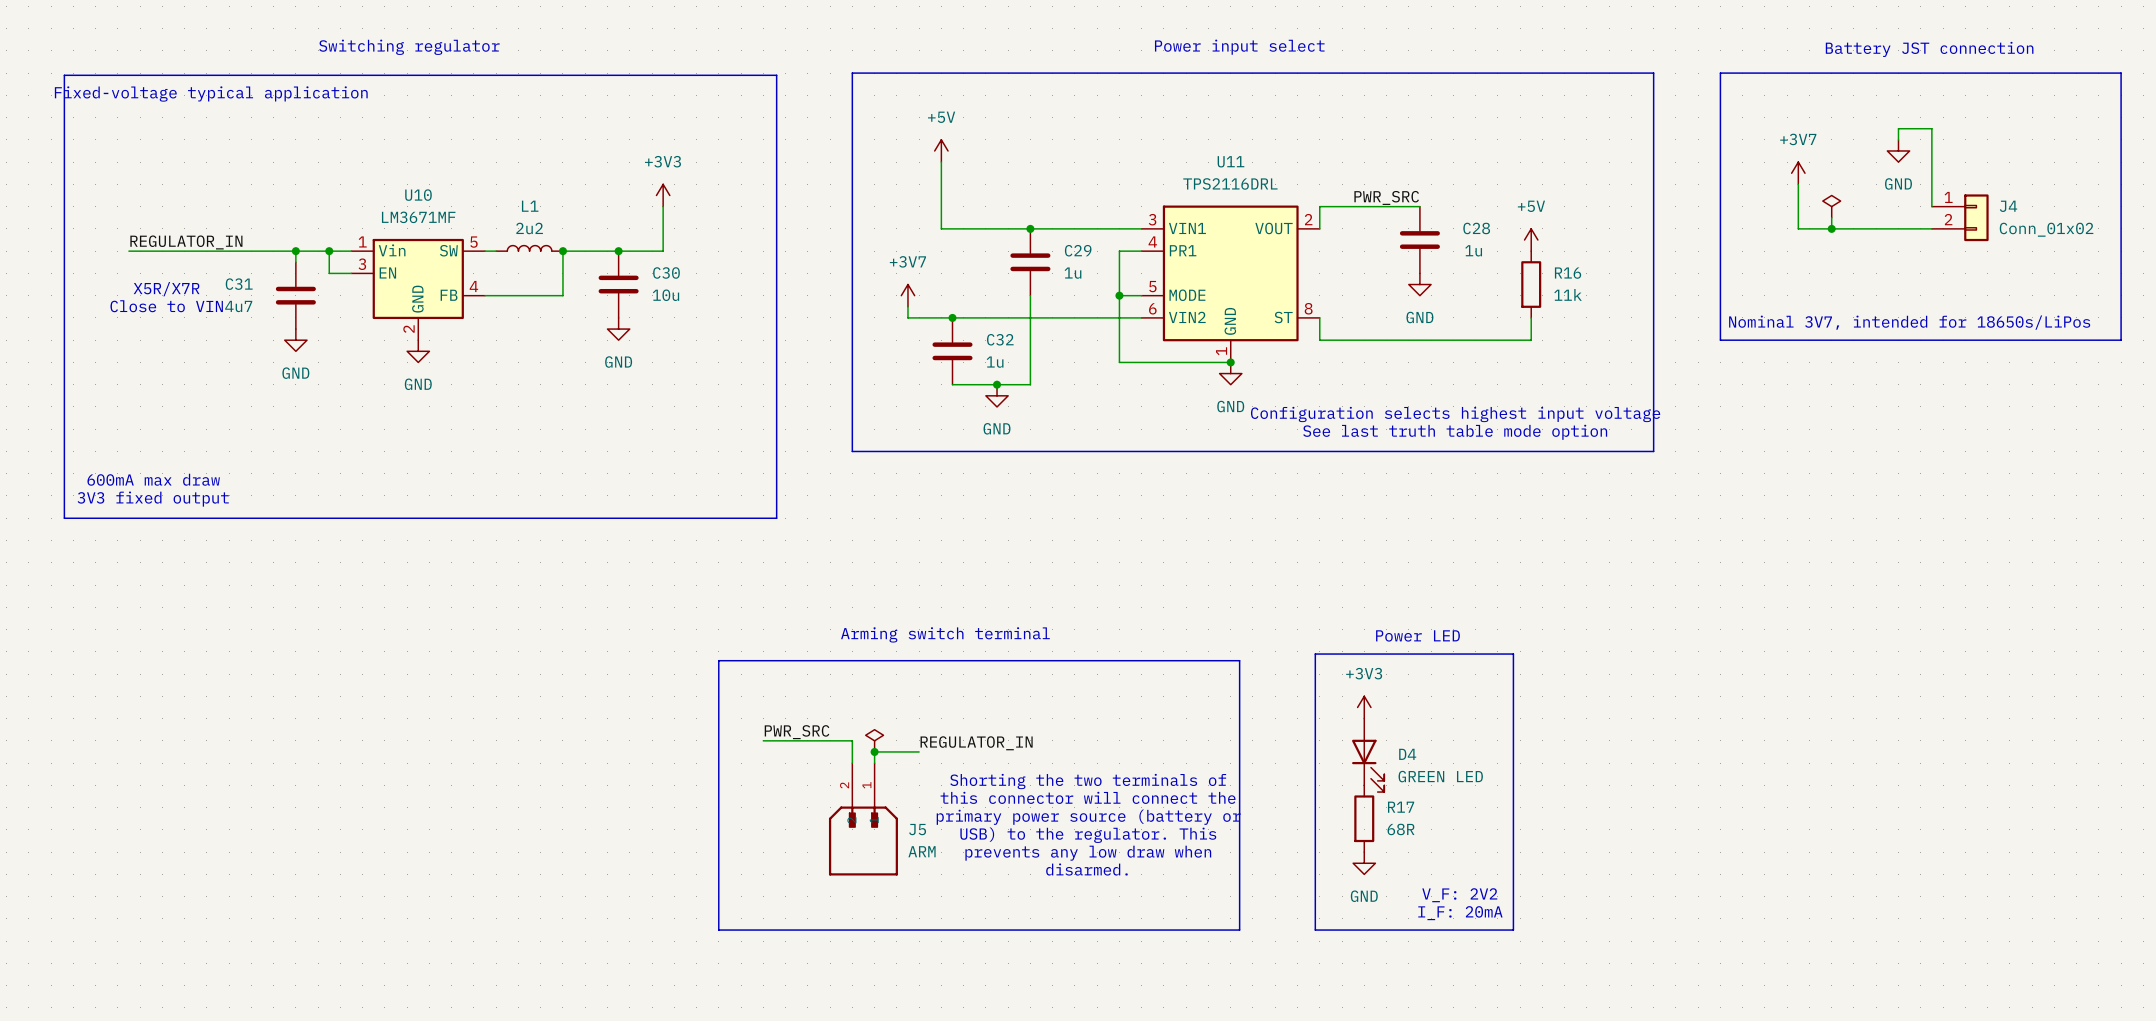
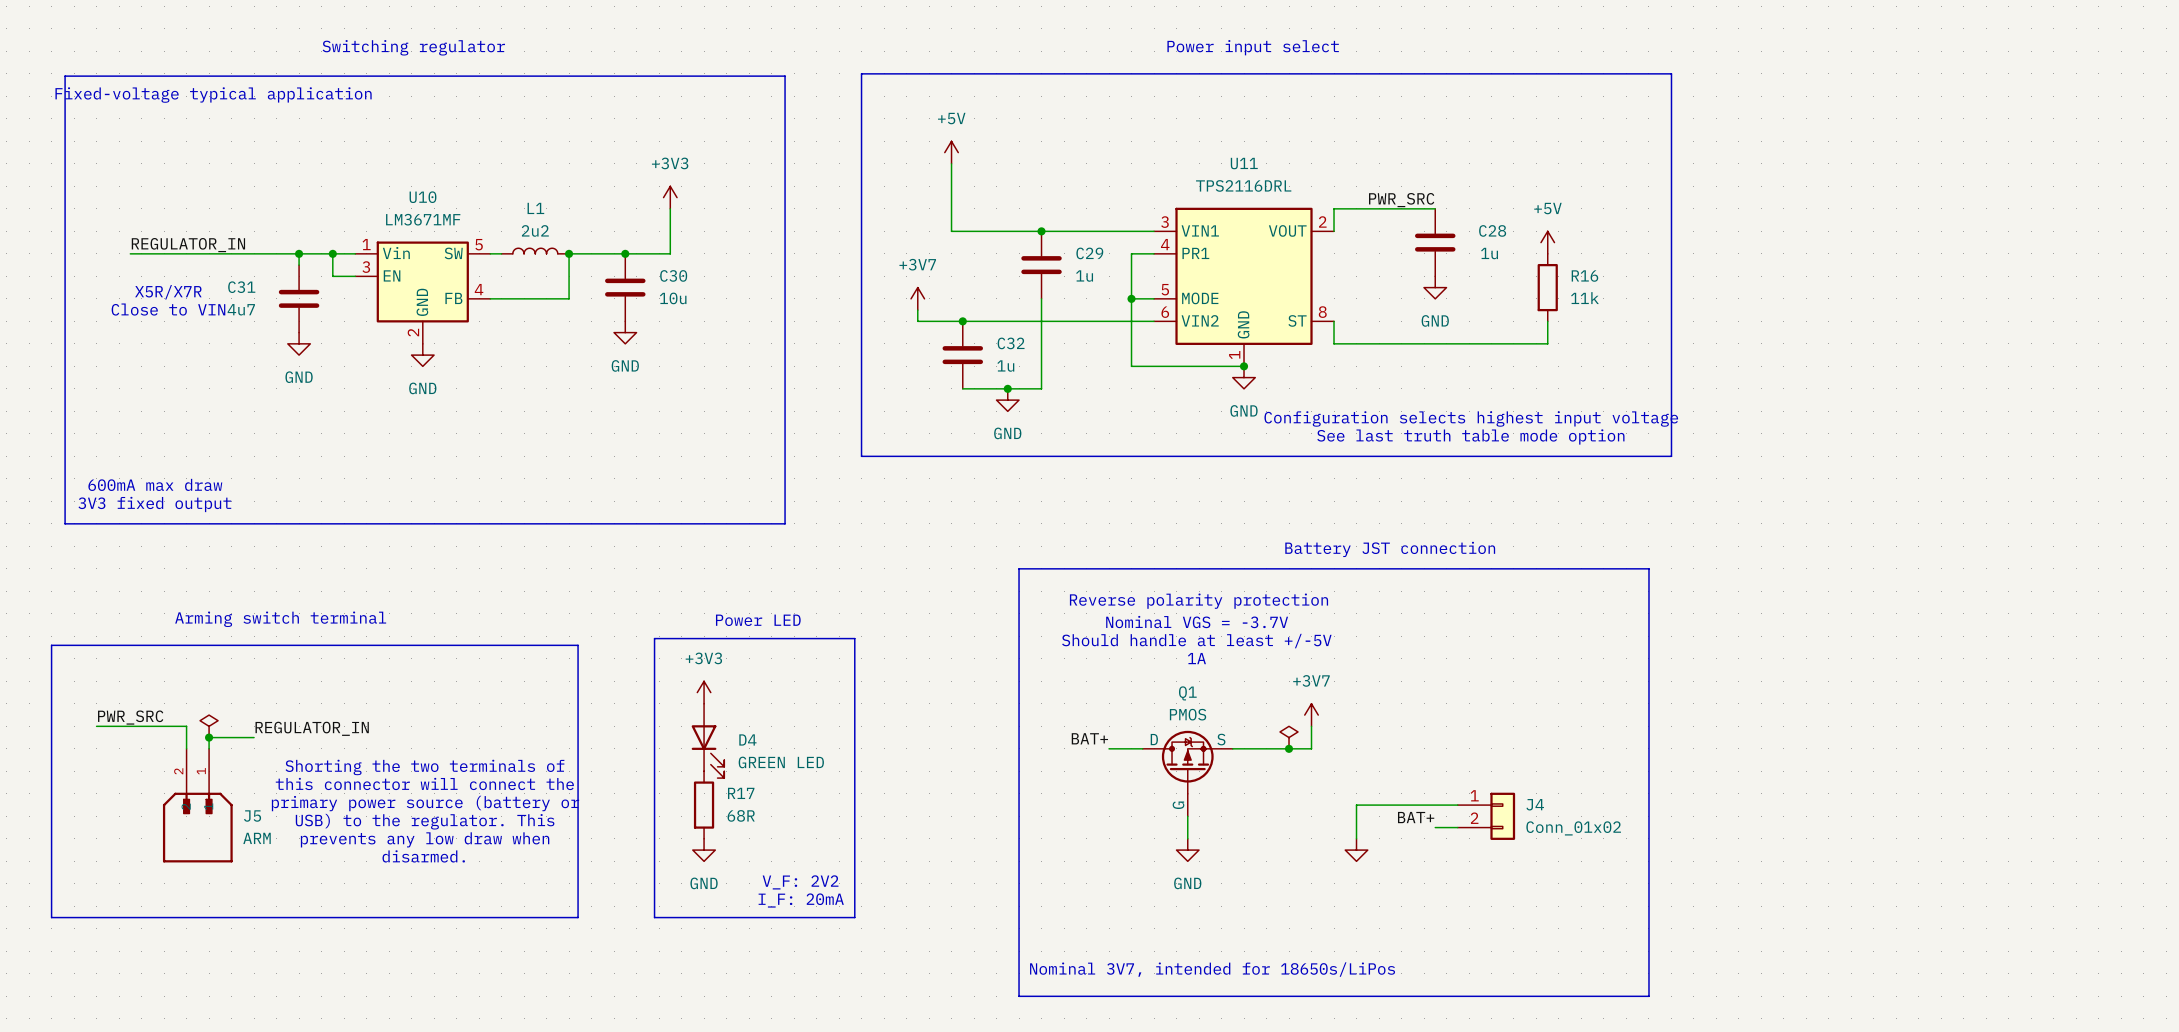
text: Battery JST connection (1929, 49) -> none
line: (1720, 73) (2121, 73) (2121, 340) (1720, 340) (1720, 73) -> none
wire: (1898, 139) (1898, 128) (1931, 128) (1931, 206) -> none
power symbol: GND (1898, 150) -> none
power symbol: +3V7 (1798, 173) -> none
wire: (1798, 184) (1798, 228) (1931, 228) -> none
power symbol: (1831, 206) -> none
wire: (1831, 217) (1831, 228) -> none
J4 position: (1960, 217) -> (1486, 816)
junction: (1831, 228) -> none
text: Nominal 3V7, intended for 18650s/LiPos (1909, 322) -> none
text: none -> Battery JST connection (1390, 549)
line: none -> (1019, 568) (1648, 568) (1648, 996) (1019, 996) (1019, 568)
text: none -> Reverse polarity protection (1198, 601)
text: none -> Arming switch terminal (280, 619)
text: none -> Power LED (758, 620)
text: none -> Nominal VGS = -3.7V (1197, 622)
line: none -> (654, 638) (854, 638) (854, 917) (654, 917) (654, 638)
text: Arming switch terminal (945, 634) -> none
text: none -> Should handle at least +/-5V (1196, 641)
text: Power LED (1417, 635) -> none
line: none -> (51, 645) (578, 645) (578, 917) (51, 917) (51, 645)
text: none -> 1A (1196, 658)
line: (1315, 654) (1513, 654) (1513, 930) (1315, 930) (1315, 654) -> none
line: (718, 660) (1239, 660) (1239, 930) (718, 930) (718, 660) -> none
power symbol: none -> +3V3 (704, 692)
power symbol: none -> +3V7 (1311, 715)
power symbol: +3V3 (1364, 707) -> none
label: none -> PWR_SRC (130, 717)
wire: none -> (96, 726) (186, 726) (186, 748)
power symbol: none -> (209, 726)
wire: none -> (1311, 726) (1311, 748) (1232, 748)
label: none -> REGULATOR_IN (312, 728)
junction: none -> (209, 737)
wire: none -> (254, 737) (209, 737) (209, 748)
power symbol: none -> (1289, 737)
label: none -> BAT+ (1089, 738)
label: PWR_SRC (797, 732) -> none
wire: (763, 740) (852, 740) (852, 763) -> none
power symbol: (874, 740) -> none
wire: none -> (1109, 748) (1142, 748)
junction: none -> (1289, 748)
label: REGULATOR_IN (976, 743) -> none
junction: (874, 751) -> none
wire: (919, 751) (874, 751) (874, 763) -> none
D4 position: (1368, 755) -> (707, 740)
text: none -> Shorting the two terminals of (424, 767)
Q1: none -> PMOS (1187, 773)
text: none -> this connector will connect the (424, 783)
text: Shorting the two terminals of (1088, 781) -> none
text: none -> primary power source (battery or (425, 803)
wire: none -> (1457, 805) (1356, 805) (1356, 838)
text: this connector will connect the (1088, 797) -> none
wire: none -> (1187, 816) (1187, 838)
label: none -> BAT+ (1416, 817)
text: none -> USB) to the regulator. This (425, 821)
text: primary power source (battery or (1088, 817) -> none
R17 position: (1364, 818) -> (704, 805)
wire: none -> (1435, 827) (1457, 827)
J5 position: (863, 819) -> (197, 805)
text: none -> prevents any low draw when (425, 839)
text: USB) to the regulator. This (1088, 835) -> none
power symbol: none -> GND (704, 850)
power symbol: none -> (1356, 850)
text: none -> disarmed. (423, 856)
text: prevents any low draw when (1088, 853) -> none
power symbol position: GND (1364, 863) -> GND (1187, 850)
text: disarmed. (1086, 869) -> none
text: none -> V_F: 2V2 (800, 882)
text: none -> I_F: 20mA (801, 900)
text: V_F: 2V2 (1459, 895) -> none
text: I_F: 20mA (1460, 913) -> none
text: none -> Nominal 3V7, intended for 18650s/LiPos (1212, 969)

